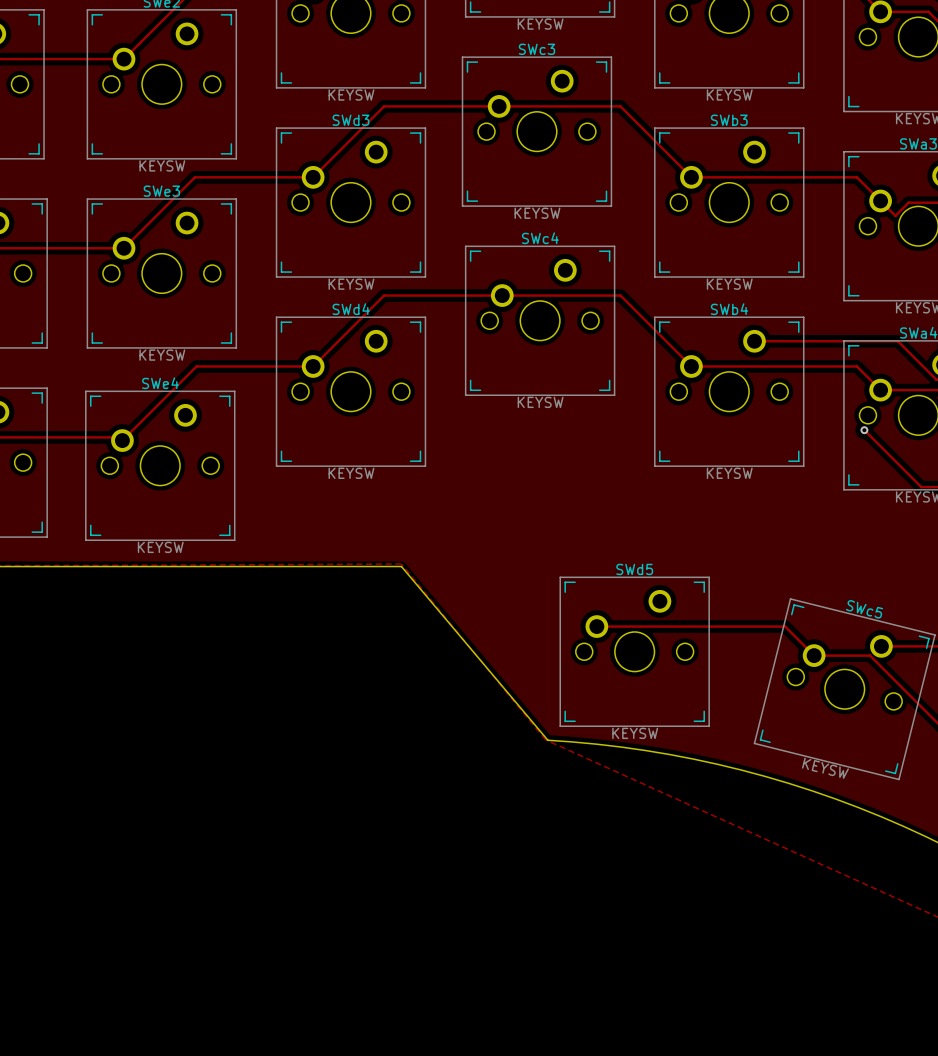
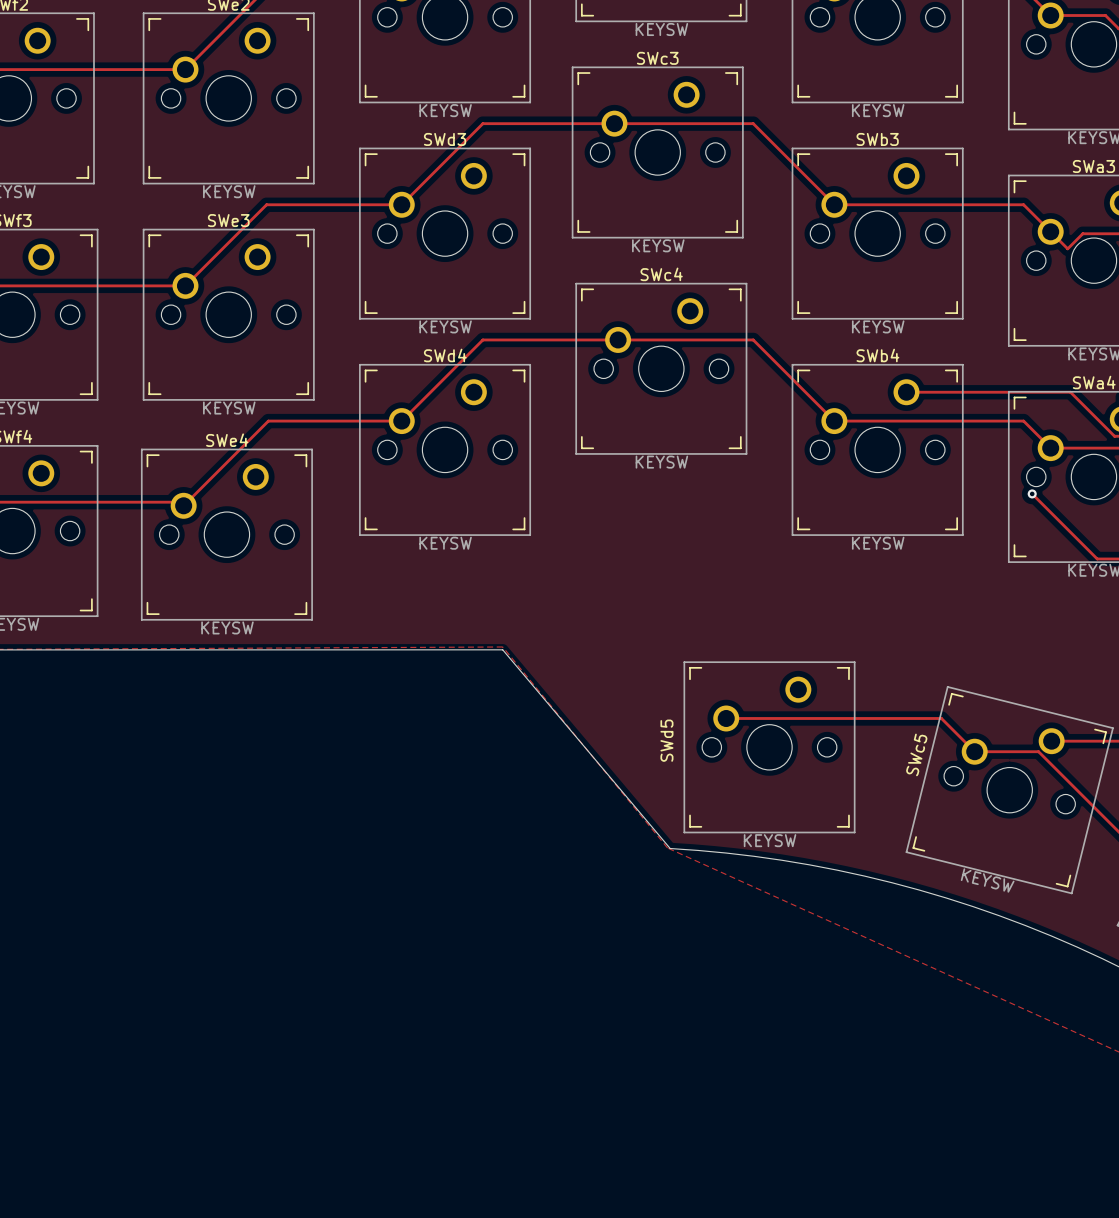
SWd5 name rotation: 0° (634, 569) -> 90° counterclockwise (666, 740)
SWd5 name position: SWd5 (634, 569) -> SWd5 (666, 740)
SWc5 name rotation: 0° (864, 609) -> 90° counterclockwise (916, 754)
SWc5 name position: SWc5 (864, 609) -> SWc5 (916, 754)

